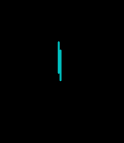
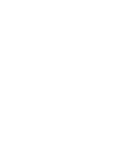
line: (58, 42) (58, 72) -> none
line: (60, 50) (60, 80) -> none

